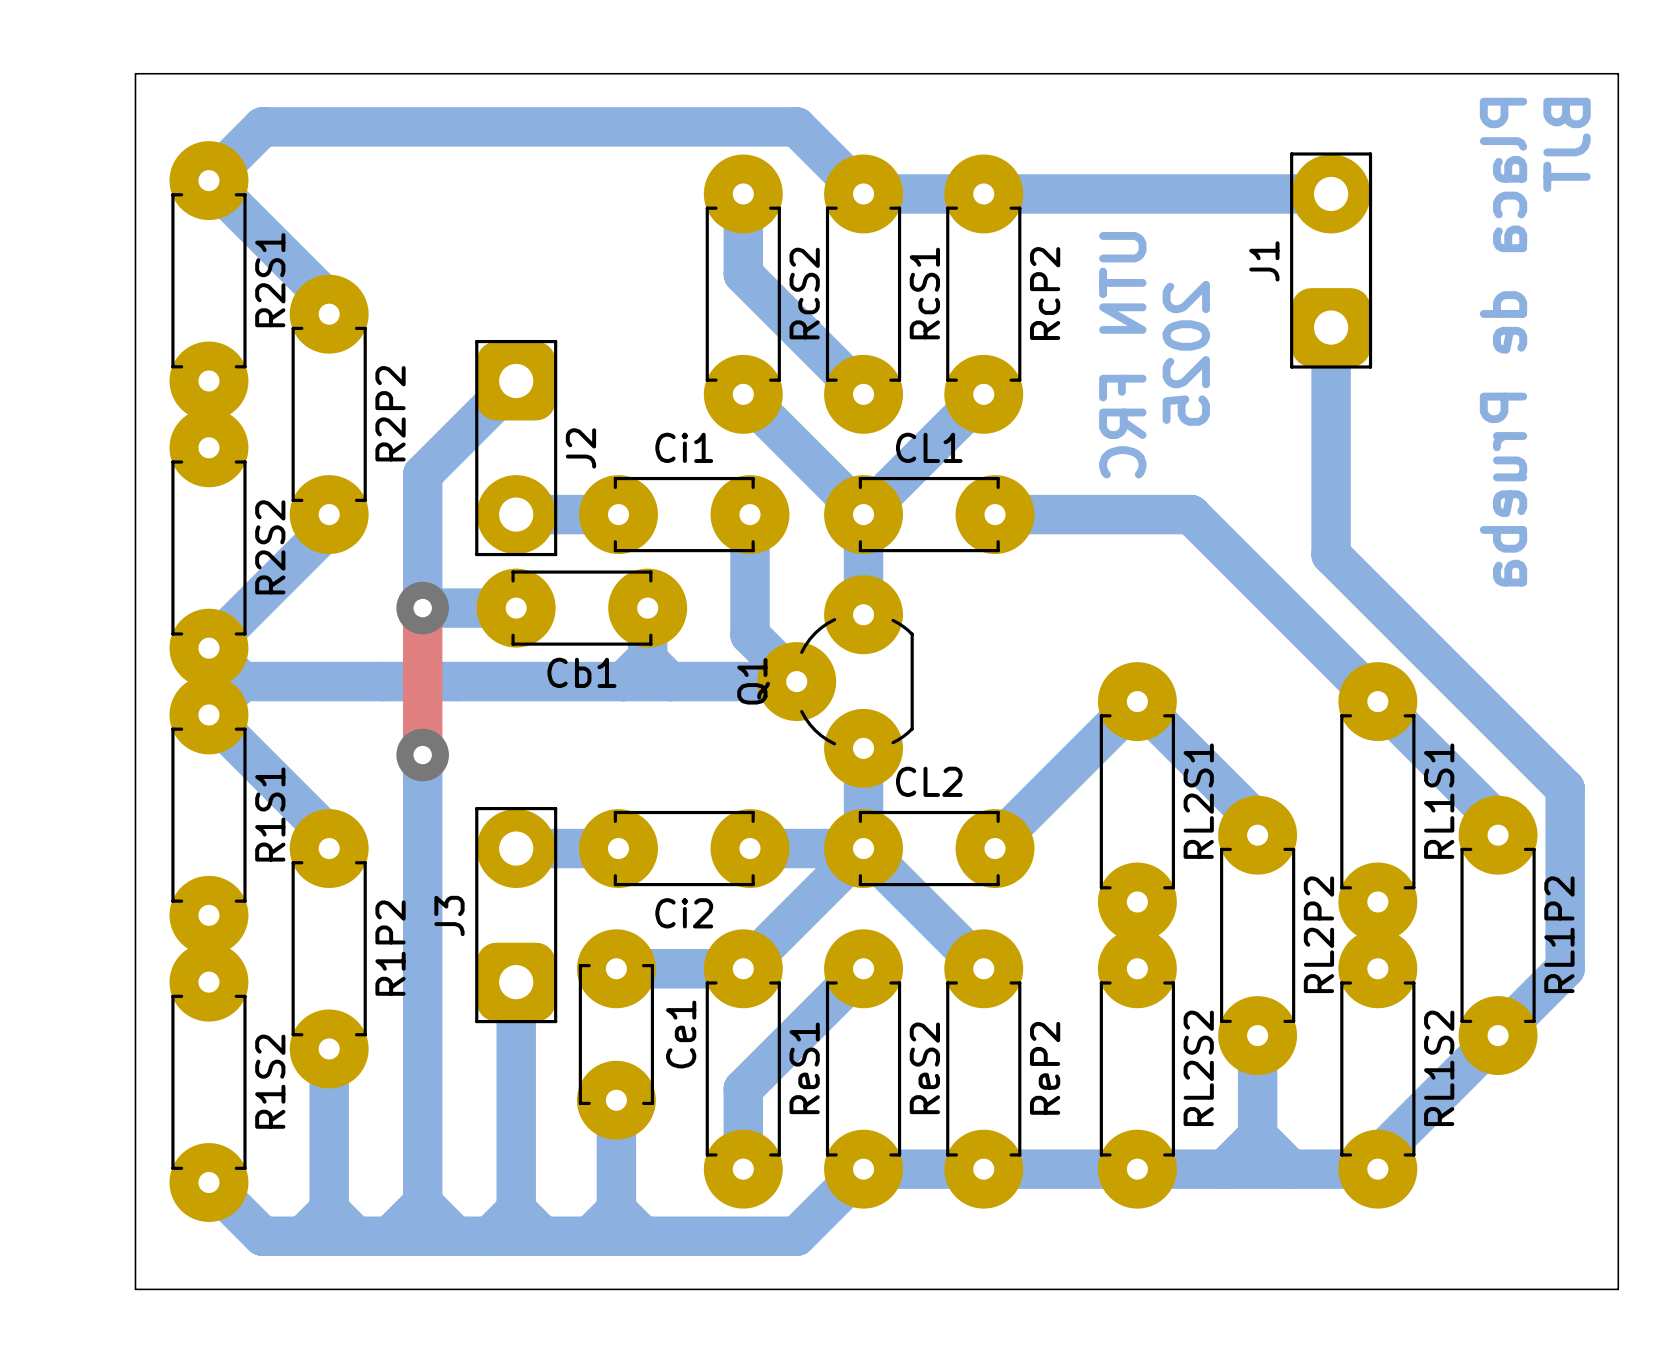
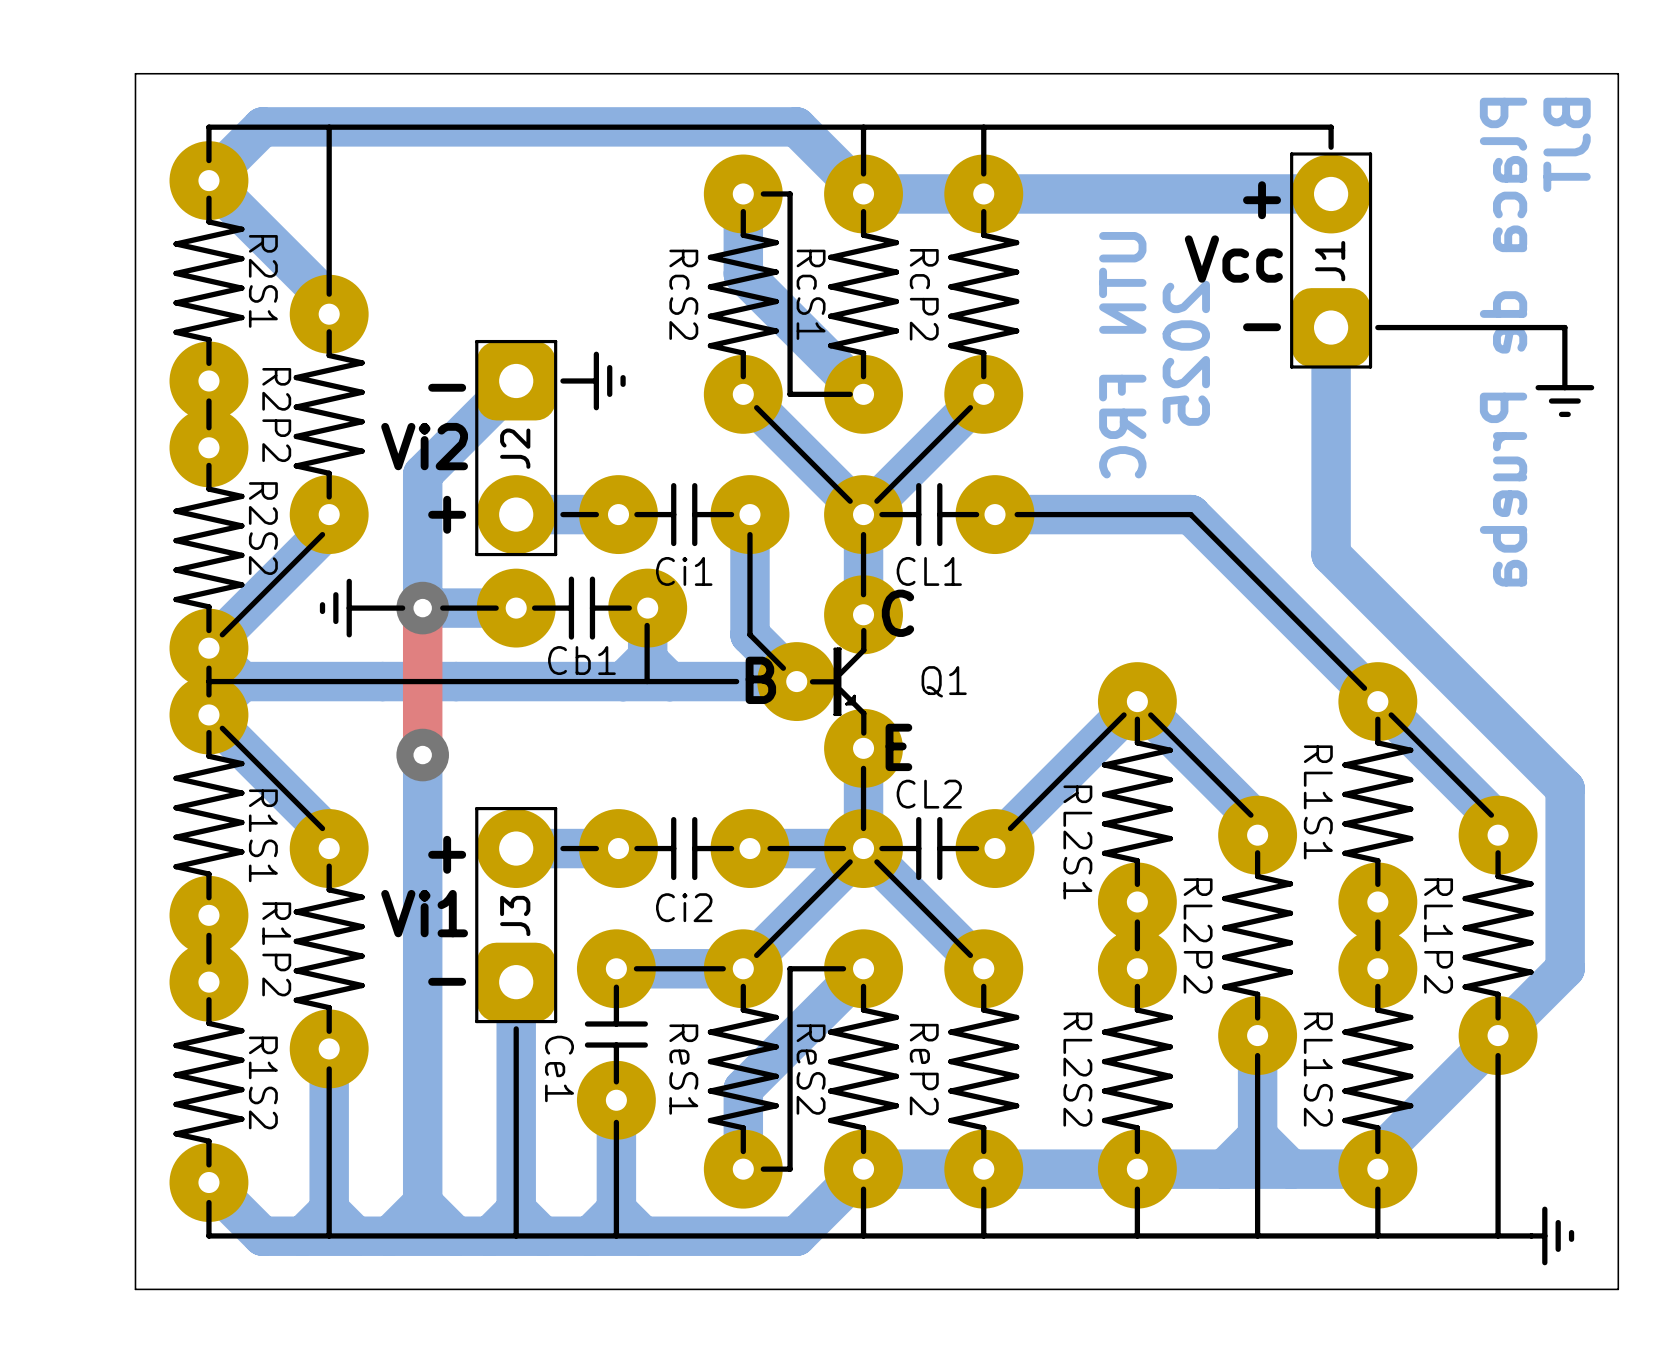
line: none -> (329, 127) (329, 294)
line: none -> (863, 127) (863, 173)
line: none -> (983, 127) (983, 173)
R2S1 footprint: [169, 141, 249, 421] -> [169, 141, 249, 421]
line: none -> (1331, 147) (1331, 127) (208, 127) (208, 160)
RcS2 footprint: [703, 154, 783, 434] -> [703, 154, 783, 434]
RcS1 footprint: [824, 154, 903, 434] -> [824, 154, 903, 434]
RcP2 footprint: [944, 154, 1024, 434] -> [944, 154, 1024, 434]
line: none -> (763, 193) (790, 193) (790, 394) (850, 394)
text: none -> + (1262, 200)
text: none -> Vcc (1233, 259)
J1 name position: J1 (1264, 261) -> J1 (1330, 261)
R2P2 footprint: [289, 274, 369, 555] -> [289, 274, 369, 555]
RcS2 name position: RcS2 (804, 293) -> RcS2 (683, 294)
RcS1 name position: RcS1 (924, 293) -> RcS1 (811, 294)
RcP2 name position: RcP2 (1045, 293) -> RcP2 (924, 294)
text: none -> - (1262, 327)
line: none -> (1377, 327) (1564, 327) (1564, 387)
line: none -> (596, 354) (596, 407)
line: none -> (609, 367) (609, 394)
line: none -> (623, 377) (623, 384)
line: none -> (562, 380) (596, 380)
text: none -> - (447, 387)
line: none -> (1538, 387) (1591, 387)
line: none -> (208, 401) (208, 427)
line: none -> (1551, 401) (1578, 401)
line: none -> (756, 407) (850, 501)
line: none -> (970, 407) (876, 501)
R2S2 footprint: [169, 408, 249, 688] -> [169, 408, 249, 688]
R2P2 name position: R2P2 (390, 413) -> R2P2 (276, 415)
line: none -> (1561, 414) (1568, 414)
text: none -> Vi2 (424, 446)
Ci1 name position: Ci1 (684, 447) -> Ci1 (684, 571)
CL1 name position: CL1 (929, 447) -> CL1 (929, 571)
J2 name position: J2 (580, 448) -> J2 (515, 448)
Ci1 footprint: [579, 475, 790, 555] -> [579, 475, 790, 555]
CL1 footprint: [824, 475, 1035, 555] -> [824, 475, 1035, 555]
text: none -> + (447, 514)
line: none -> (562, 514) (596, 514)
line: none -> (1017, 514) (1190, 514) (1364, 688)
line: none -> (322, 534) (222, 634)
line: none -> (749, 534) (749, 634) (783, 668)
line: none -> (863, 534) (863, 594)
Cb1 footprint: [476, 568, 688, 648] -> [476, 568, 688, 648]
Q1 footprint: [757, 575, 914, 788] -> [757, 575, 903, 788]
line: none -> (349, 581) (349, 634)
line: none -> (335, 594) (335, 621)
line: none -> (322, 604) (322, 611)
line: none -> (349, 608) (402, 608)
line: none -> (442, 608) (496, 608)
line: none -> (647, 625) (647, 681)
RL2S1 footprint: [1097, 662, 1177, 942] -> [1097, 662, 1177, 942]
RL1S1 footprint: [1338, 662, 1418, 942] -> [1338, 662, 1418, 942]
line: none -> (208, 668) (208, 694)
R1S1 footprint: [169, 675, 249, 955] -> [169, 675, 249, 955]
line: none -> (208, 681) (736, 681)
Q1 name position: Q1 (753, 681) -> Q1 (944, 681)
line: none -> (1124, 714) (1010, 828)
line: none -> (1150, 714) (1250, 815)
line: none -> (1391, 714) (1491, 815)
line: none -> (222, 728) (322, 828)
line: none -> (863, 768) (863, 828)
RL2P2 footprint: [1218, 795, 1298, 1076] -> [1218, 795, 1298, 1076]
RL1P2 footprint: [1458, 795, 1538, 1076] -> [1458, 795, 1538, 1076]
RL2S1 name position: RL2S1 (1198, 801) -> RL2S1 (1077, 842)
RL1S1 name position: RL1S1 (1439, 801) -> RL1S1 (1318, 802)
R1P2 footprint: [289, 809, 369, 1089] -> [289, 809, 369, 1089]
Ci2 footprint: [579, 809, 790, 888] -> [579, 809, 790, 888]
CL2 footprint: [824, 809, 1035, 888] -> [824, 809, 1035, 888]
line: none -> (562, 848) (596, 848)
line: none -> (770, 848) (843, 848)
text: none -> + (447, 854)
line: none -> (850, 861) (756, 955)
line: none -> (876, 861) (970, 955)
text: none -> Vi1 (424, 913)
J3 name position: J3 (449, 915) -> J3 (515, 915)
line: none -> (1137, 922) (1137, 948)
line: none -> (1377, 922) (1377, 948)
Ce1 footprint: [576, 929, 656, 1140] -> [576, 929, 656, 1140]
ReS1 footprint: [703, 929, 783, 1209] -> [703, 929, 783, 1209]
ReS2 footprint: [824, 929, 903, 1209] -> [824, 929, 903, 1209]
ReP2 footprint: [944, 929, 1024, 1209] -> [944, 929, 1024, 1209]
RL2S2 footprint: [1097, 929, 1177, 1209] -> [1097, 929, 1177, 1209]
RL1S2 footprint: [1338, 929, 1418, 1209] -> [1338, 929, 1418, 1209]
RL2P2 name position: RL2P2 (1318, 934) -> RL2P2 (1198, 936)
RL1P2 name position: RL1P2 (1559, 934) -> RL1P2 (1438, 936)
line: none -> (208, 935) (208, 962)
R1S2 footprint: [169, 942, 249, 1222] -> [169, 942, 249, 1222]
R1P2 name position: R1P2 (390, 948) -> R1P2 (276, 949)
line: none -> (636, 968) (723, 968)
line: none -> (843, 968) (790, 968) (790, 1169) (763, 1169)
text: none -> - (447, 981)
line: none -> (516, 1028) (516, 1235)
Ce1 name position: Ce1 (681, 1034) -> Ce1 (559, 1068)
line: none -> (1257, 1055) (1257, 1235)
line: none -> (1498, 1055) (1498, 1235)
line: none -> (329, 1068) (329, 1235)
ReS1 name position: ReS1 (804, 1068) -> ReS1 (683, 1069)
ReS2 name position: ReS2 (924, 1068) -> ReS2 (811, 1069)
ReP2 name position: ReP2 (1045, 1068) -> ReP2 (924, 1069)
RL2S2 name position: RL2S2 (1198, 1068) -> RL2S2 (1077, 1069)
RL1S2 name position: RL1S2 (1439, 1068) -> RL1S2 (1318, 1069)
line: none -> (616, 1122) (616, 1235)
line: none -> (863, 1189) (863, 1235)
line: none -> (983, 1189) (983, 1235)
line: none -> (1137, 1189) (1137, 1235)
line: none -> (1377, 1189) (1377, 1235)
line: none -> (208, 1202) (208, 1235) (1544, 1235)
line: none -> (1544, 1209) (1544, 1262)
line: none -> (1558, 1222) (1558, 1249)
line: none -> (1571, 1232) (1571, 1239)

